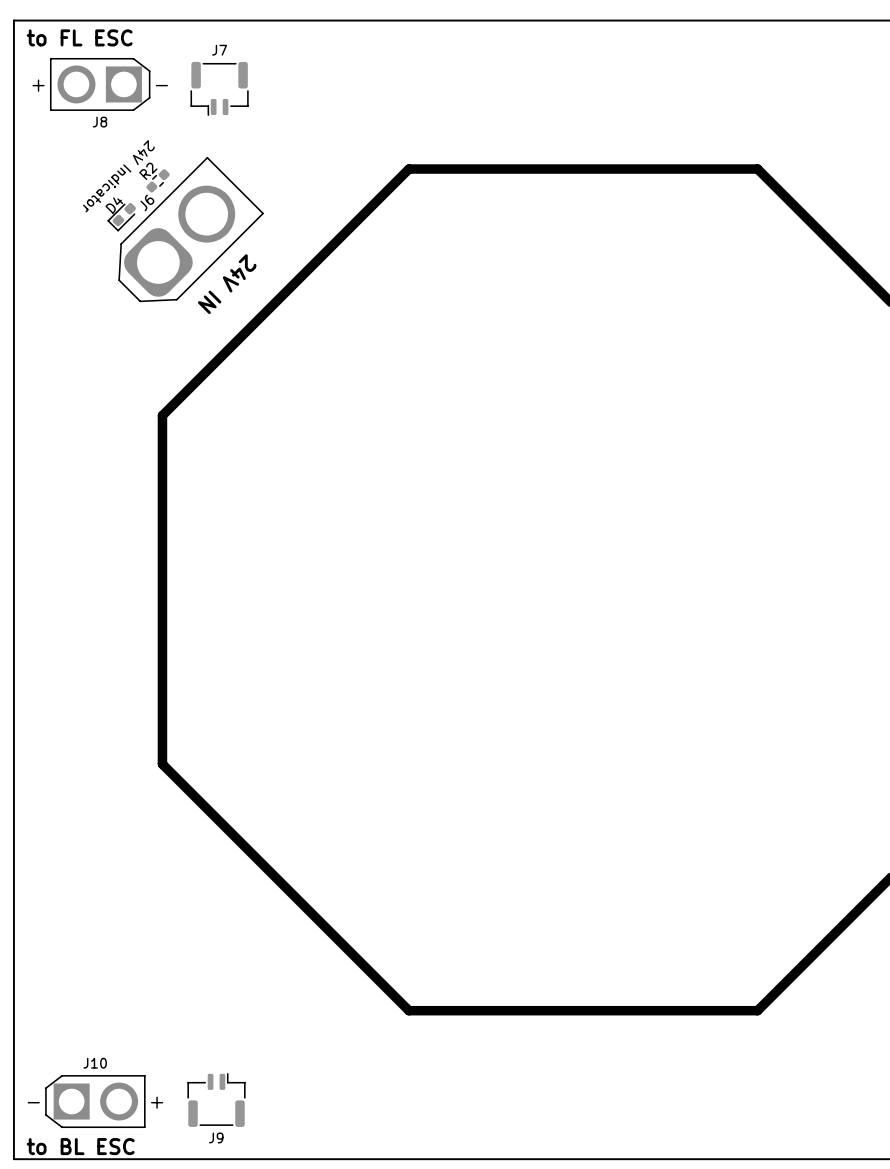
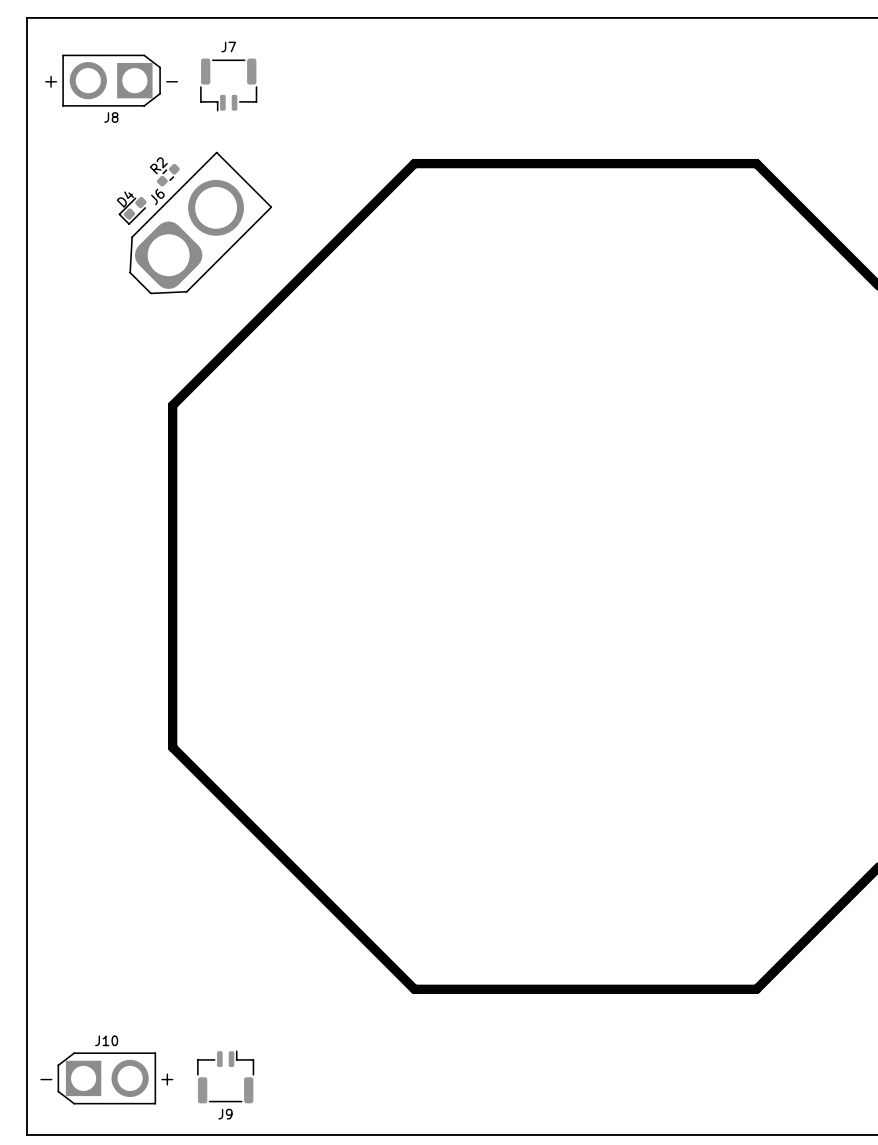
text: to FL ESC (79, 37) -> none
text: 24V Indicator (118, 176) -> none
text: 24V IN (227, 284) -> none
text: to BL ESC (80, 1146) -> none

